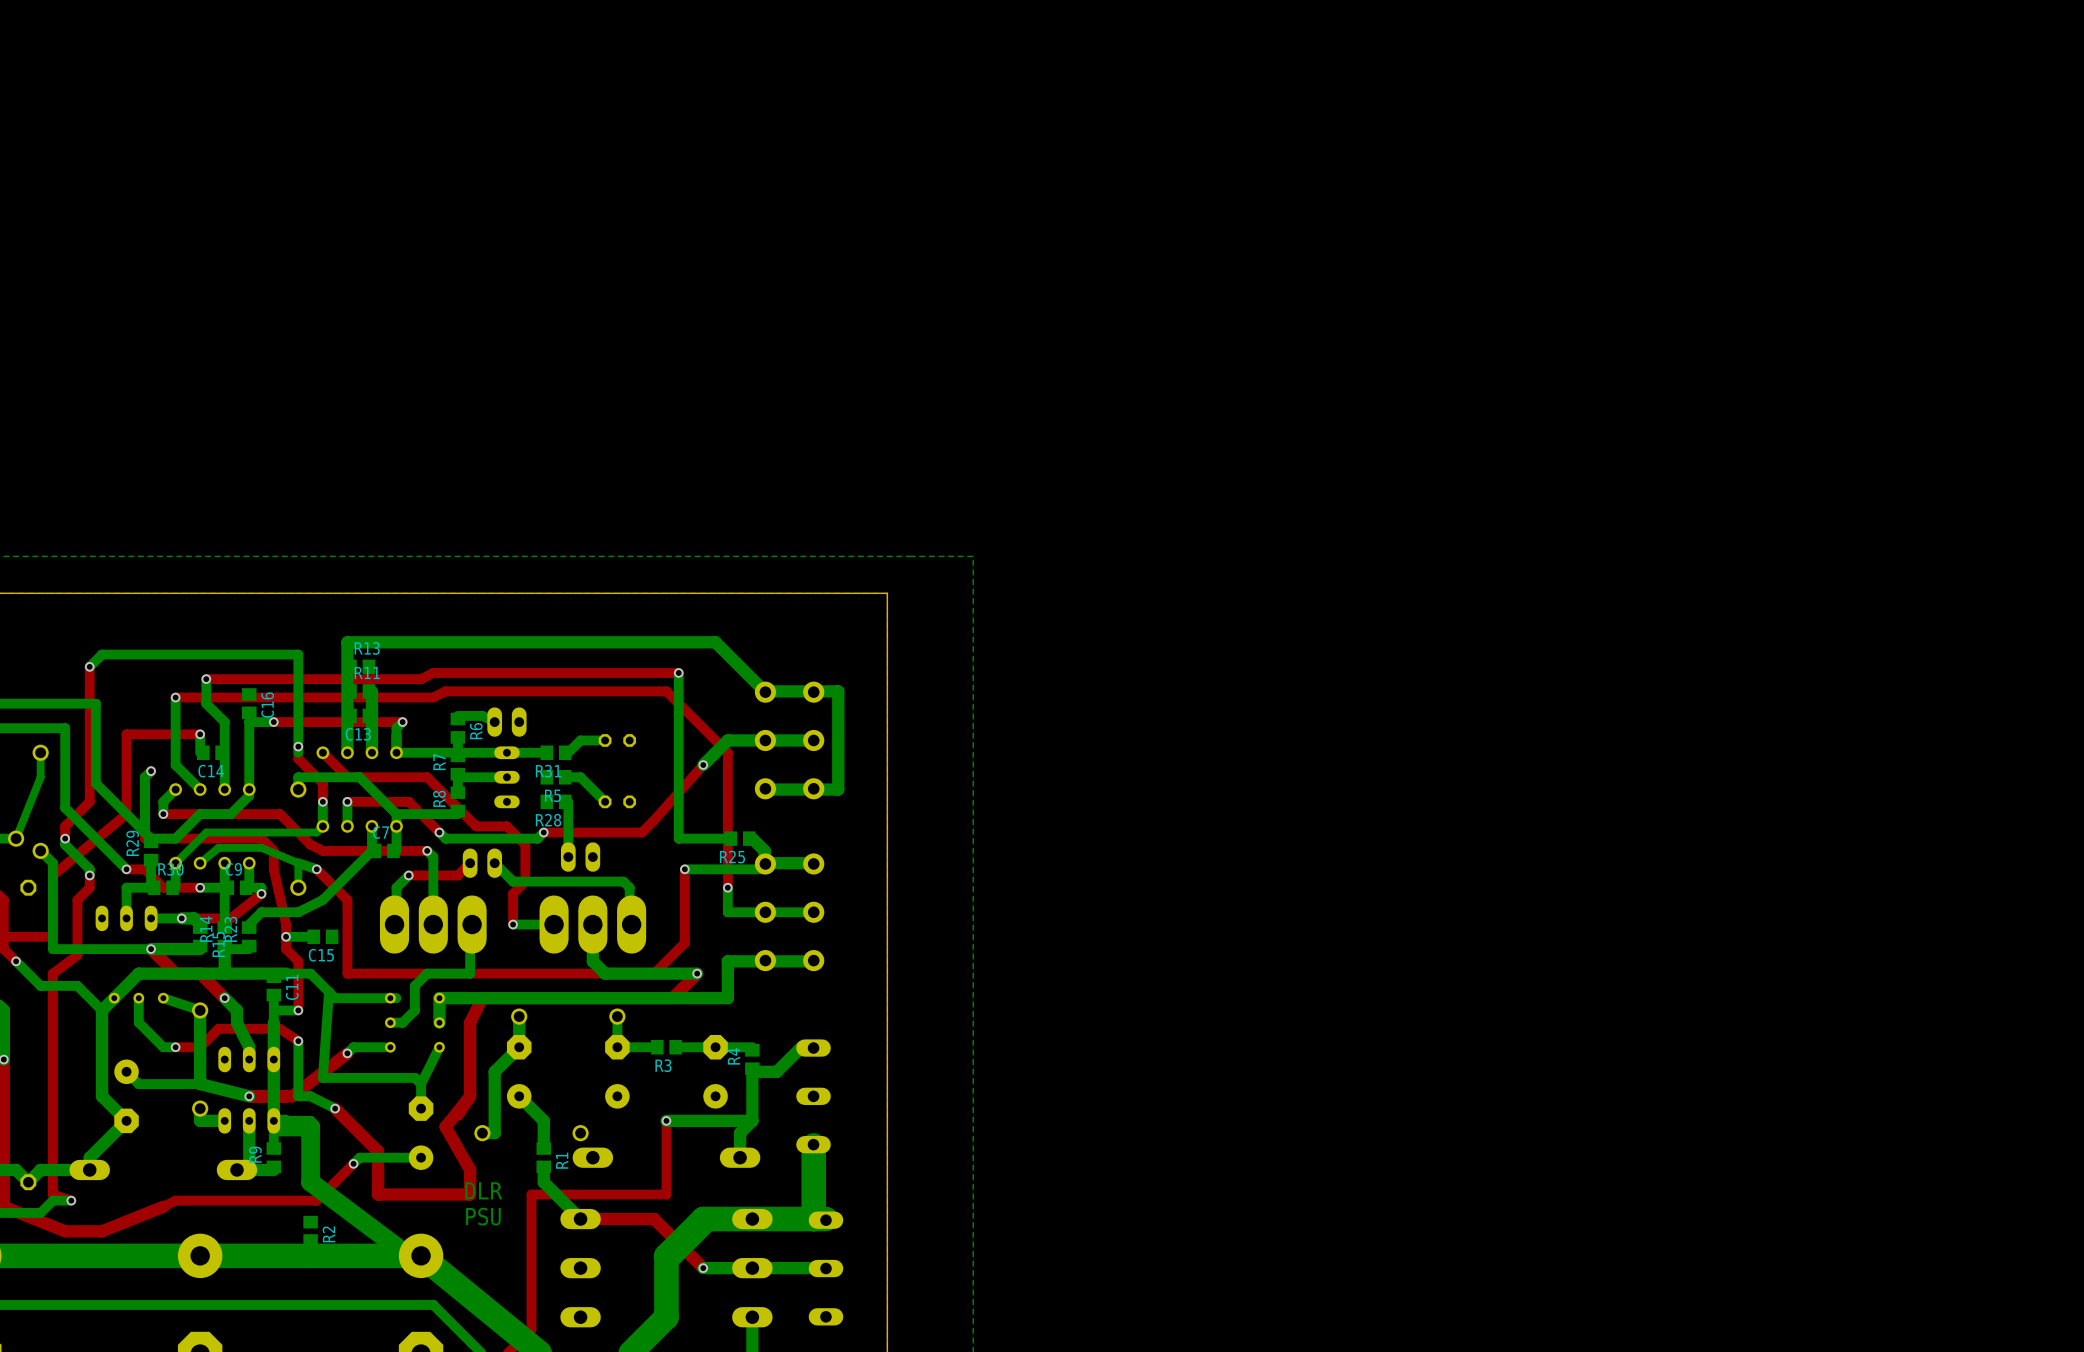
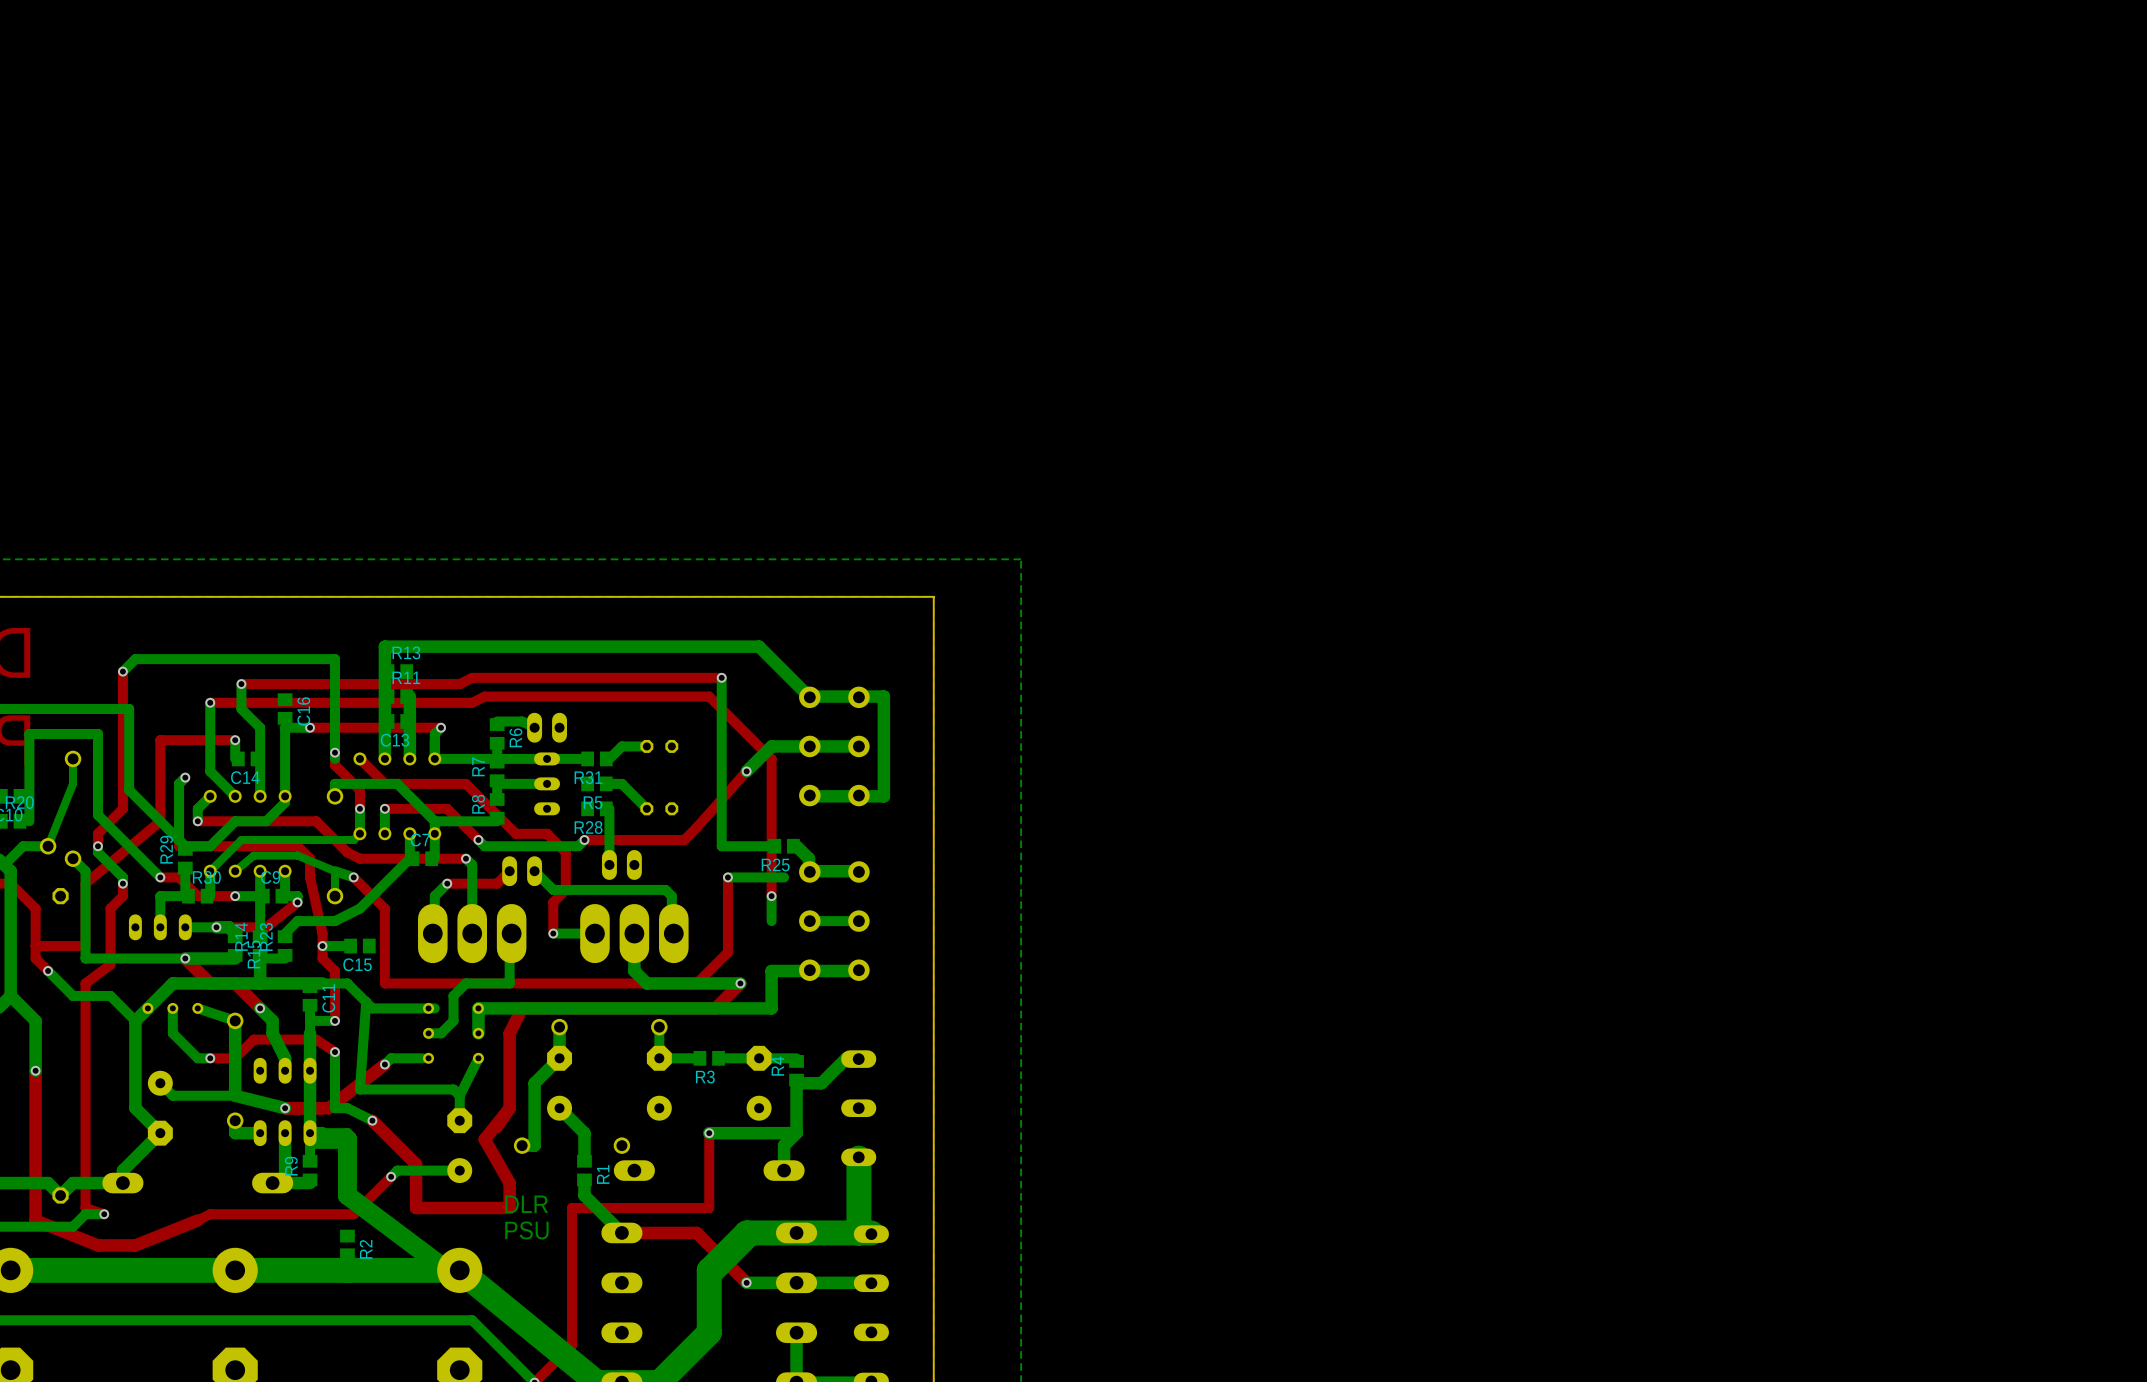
bottom track: (764, 869) (740, 869) -> none
bottom track: (765, 912) (727, 912) -> none

